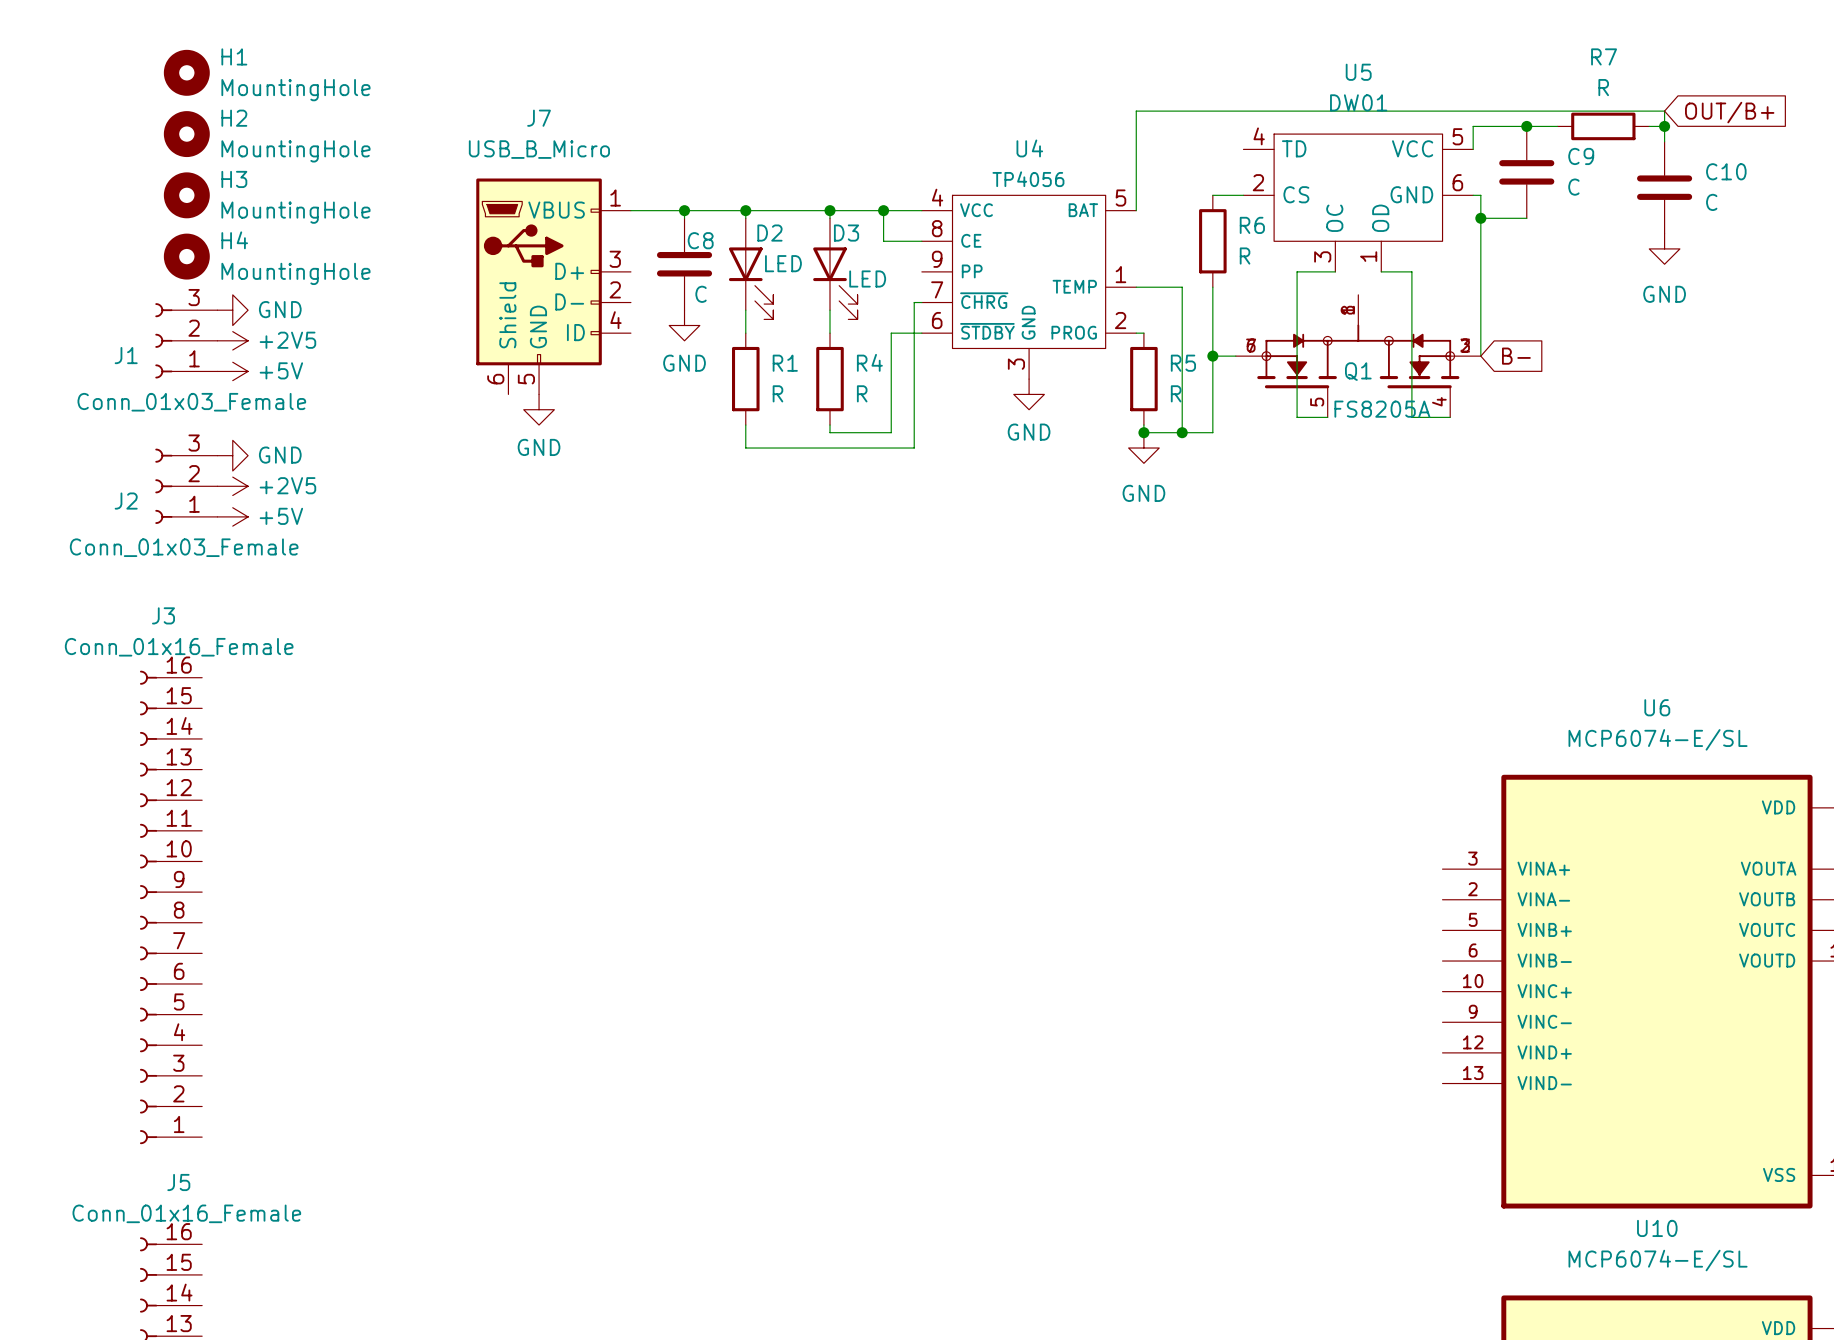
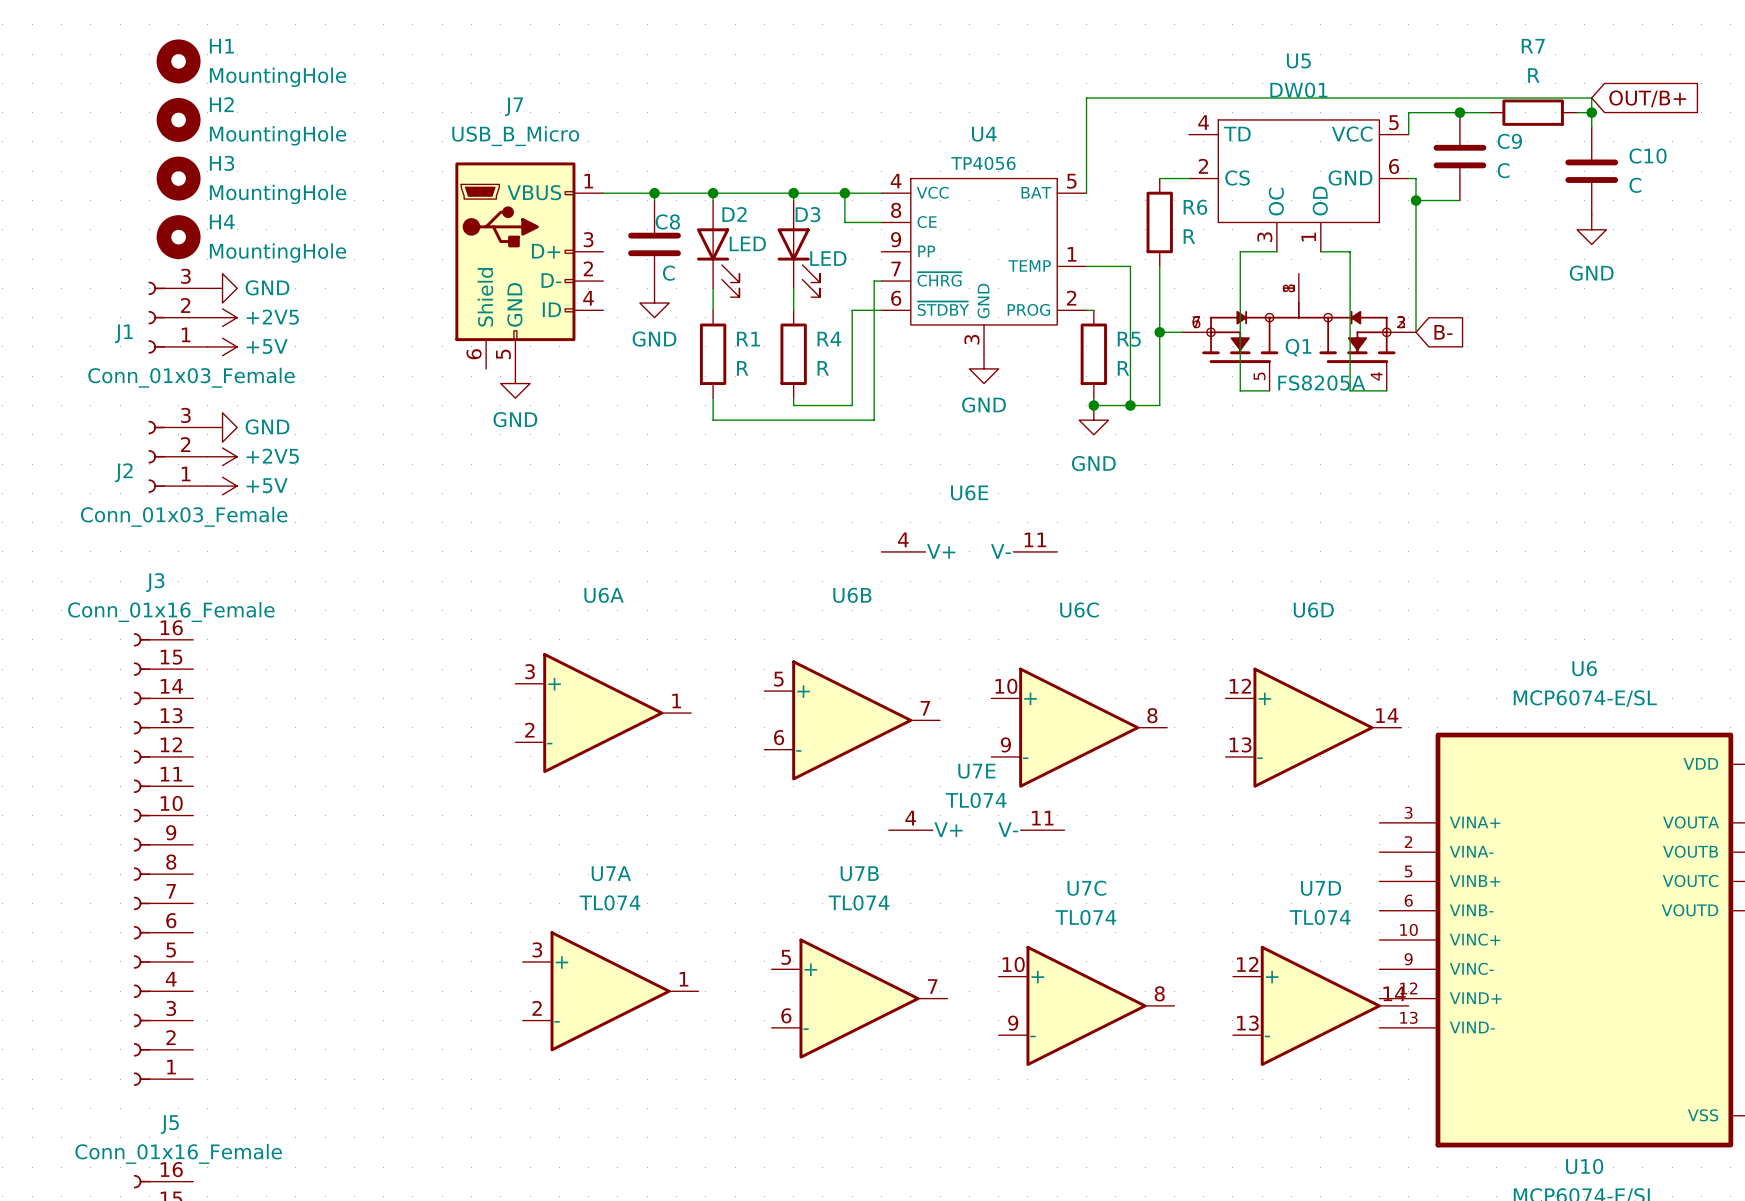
U6E: none -> (969, 551)
U6A: none -> (603, 713)
U6B: none -> (852, 720)
U6C: none -> (1079, 727)
U6D: none -> (1313, 727)
U7E: none -> TL074 (976, 830)
U7A: none -> TL074 (610, 991)
U7B: none -> TL074 (859, 998)
U7C: none -> TL074 (1086, 1005)
U7D: none -> TL074 (1320, 1005)

